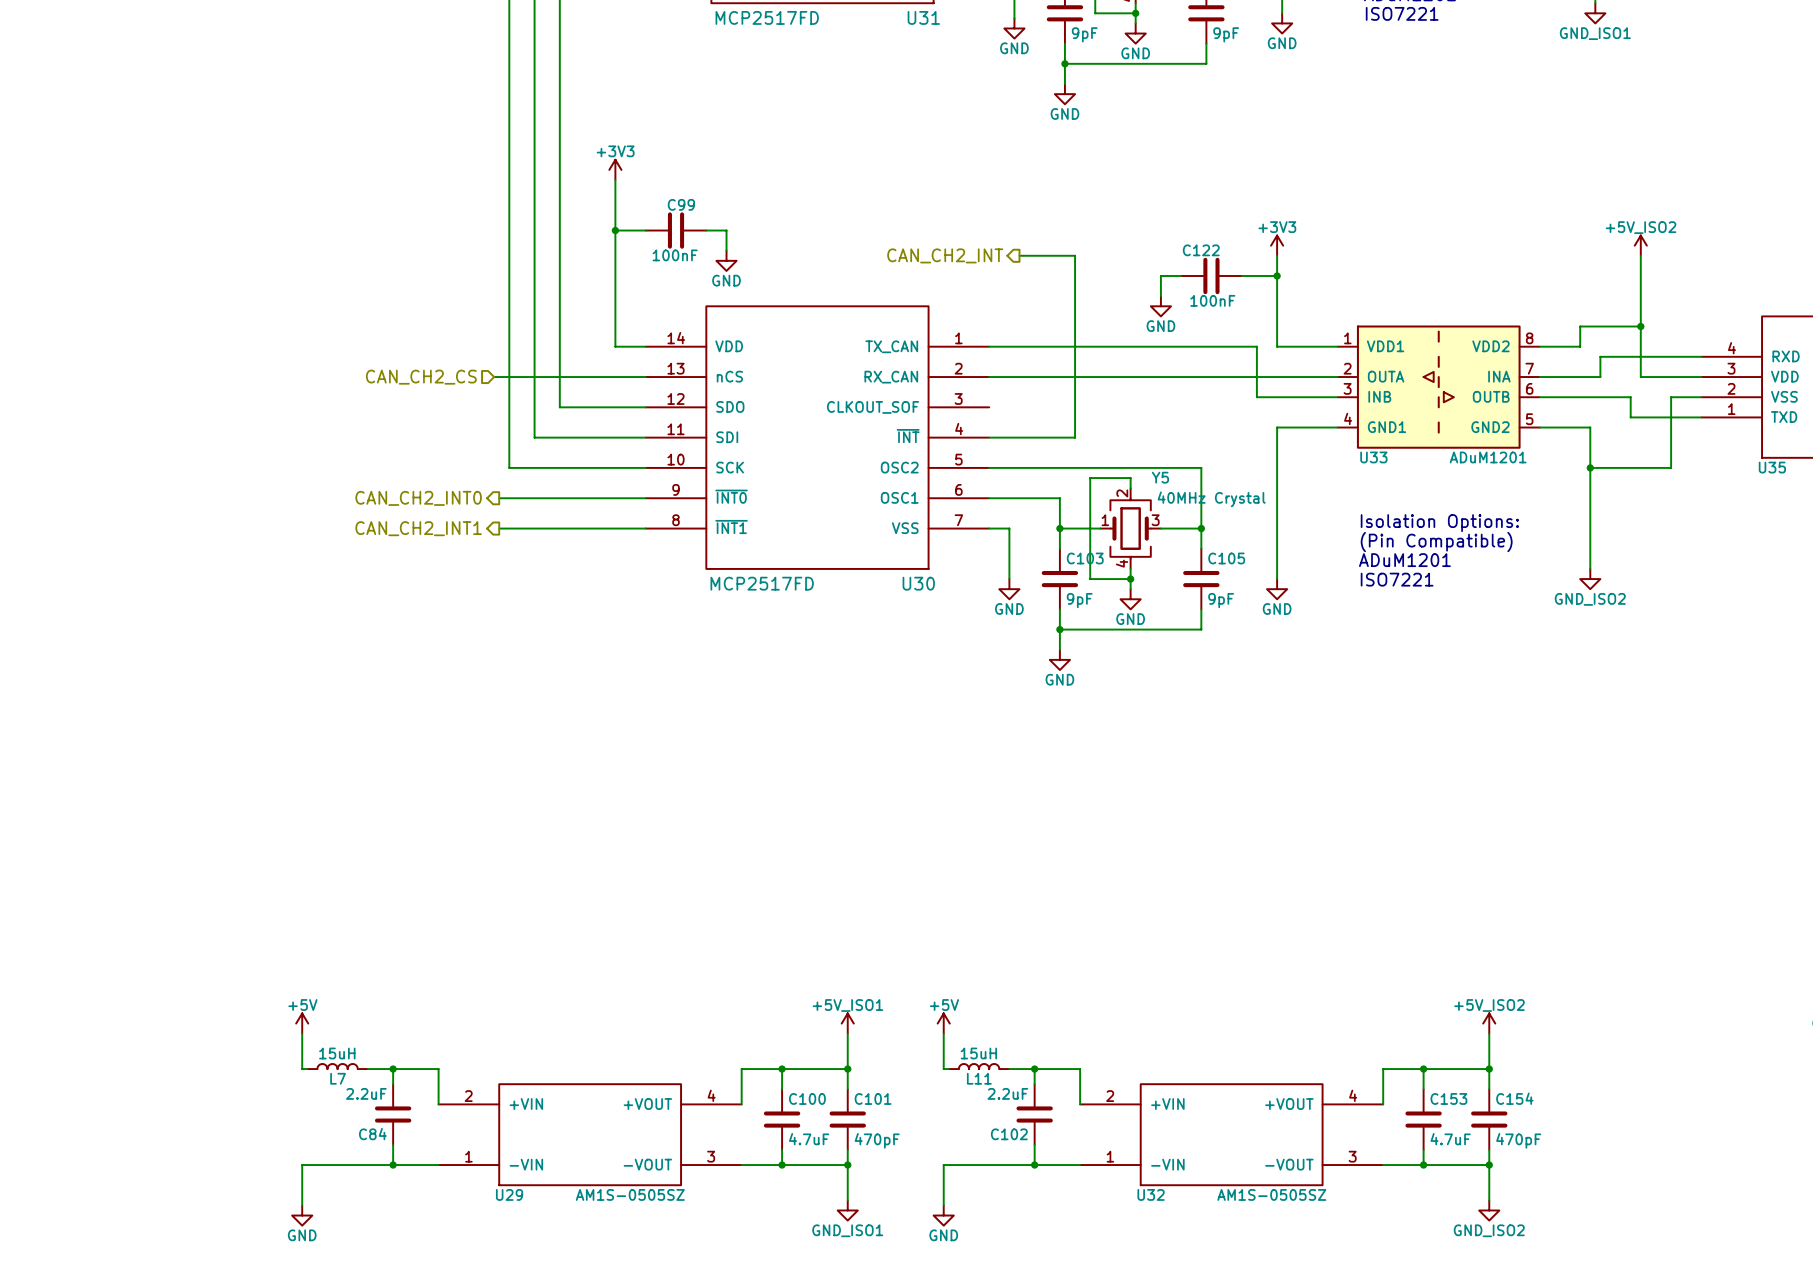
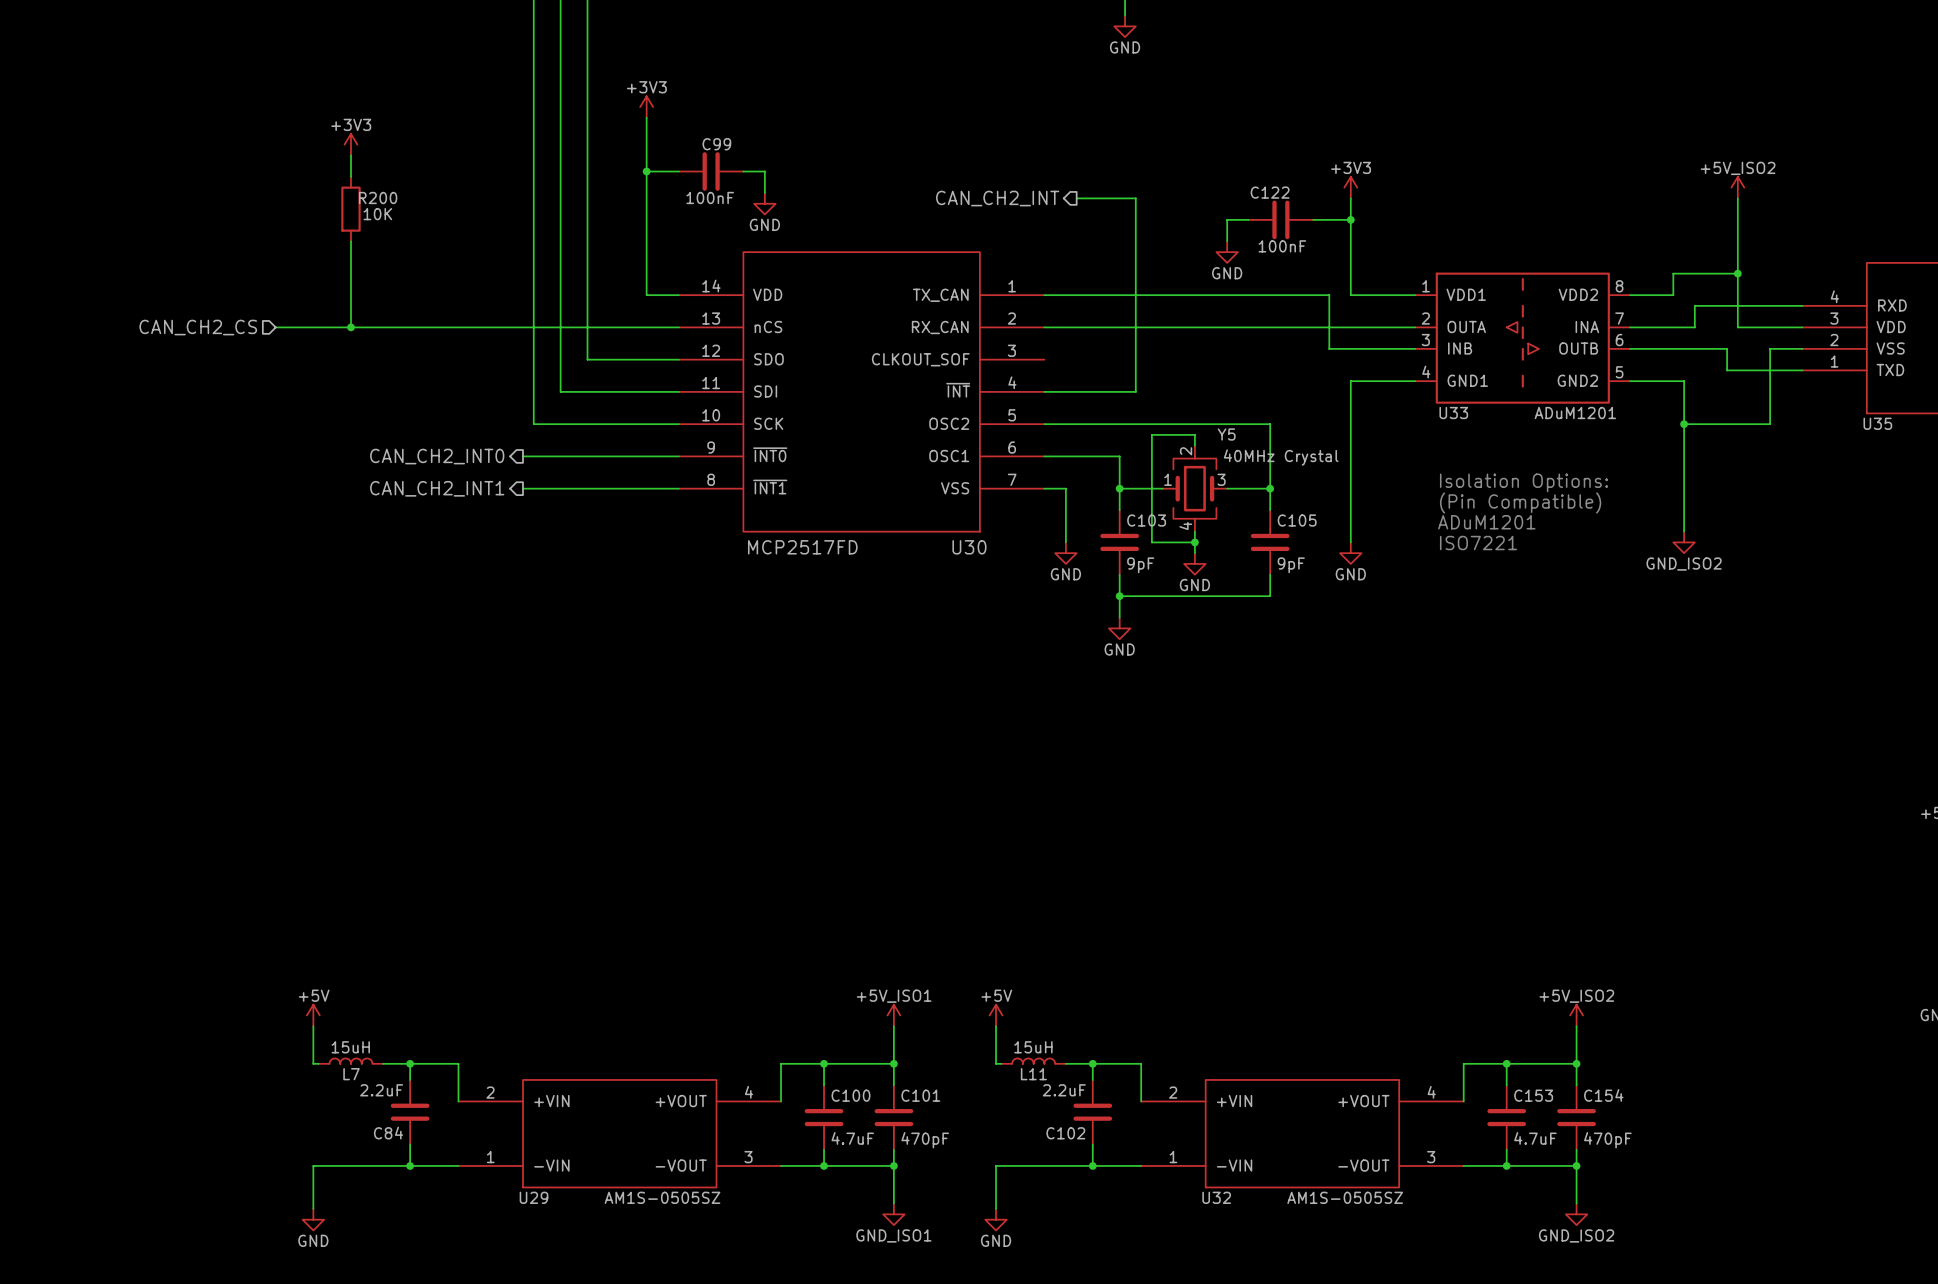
power symbol: none -> +3V3 (350, 144)
wire: none -> (350, 155) (350, 176)
R200: none -> 10K (350, 209)
wire: none -> (350, 241) (350, 327)
hierarchical label: none -> CAN_CH2_CS (198, 327)
wire: none -> (275, 327) (517, 327)
junction: none -> (350, 327)
hierarchical label: CAN_CH2_CS (421, 377) -> none

